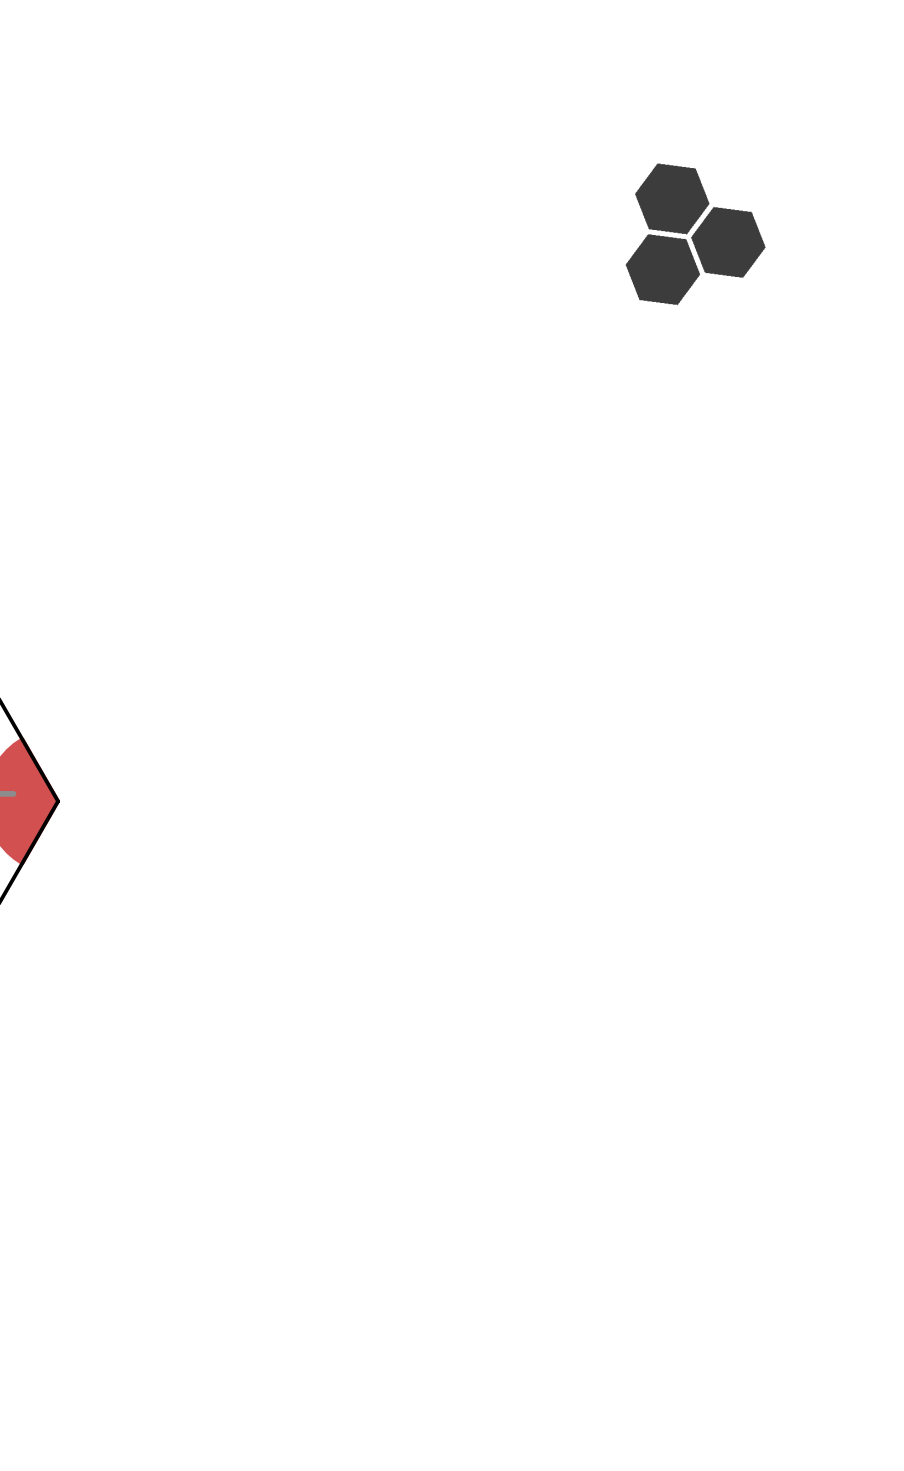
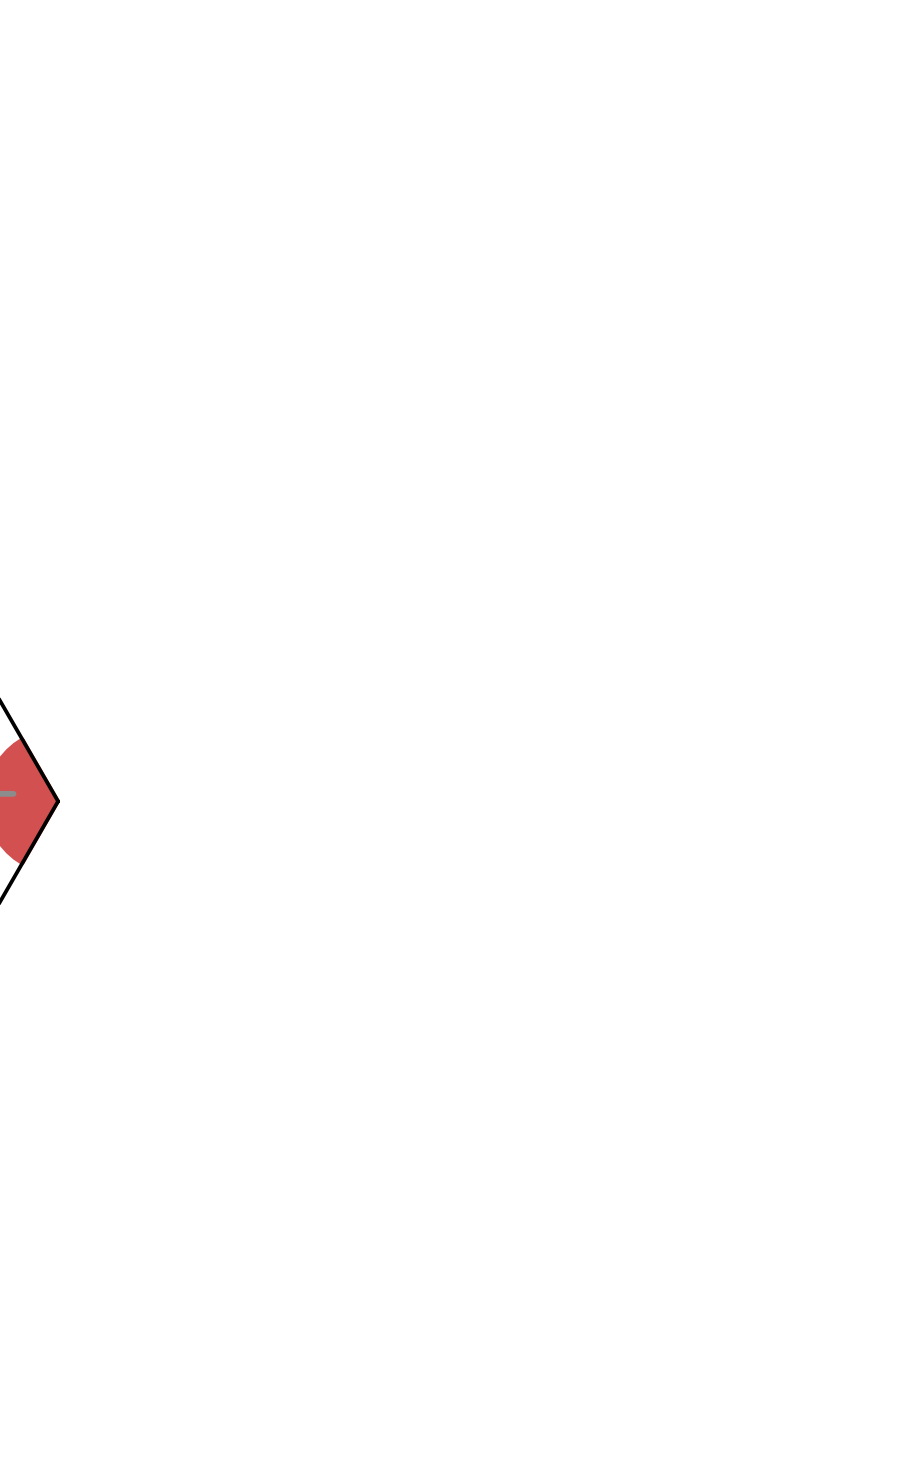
drawing: [625, 163, 766, 306] -> none

